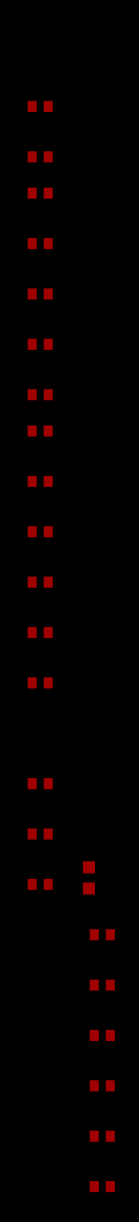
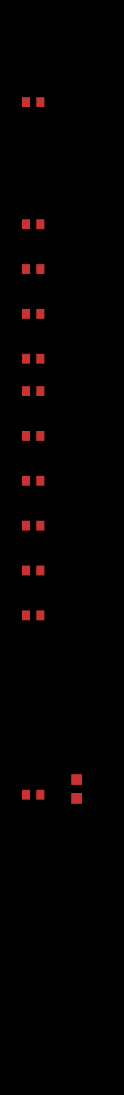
part: (40, 156) -> none
part: (40, 193) -> none
part: (40, 783) -> none
part: (40, 834) -> none
part: (102, 934) -> none
part: (102, 985) -> none
part: (102, 1035) -> none
part: (102, 1085) -> none
part: (102, 1136) -> none
part: (102, 1186) -> none

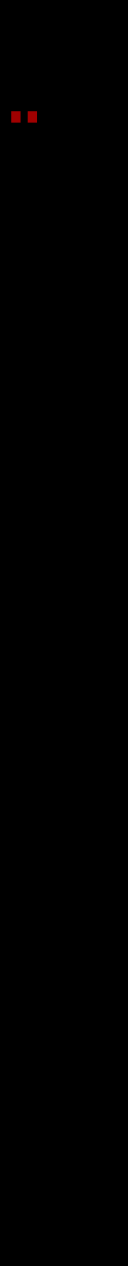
part: (33, 224) -> none
part: (33, 269) -> none
part: (33, 313) -> none
part: (33, 358) -> none
part: (33, 391) -> none
part: (33, 435) -> none
part: (33, 480) -> none
part: (33, 525) -> none
part: (33, 570) -> none
part: (33, 615) -> none
part: (76, 788) -> none
part: (33, 794) -> none

